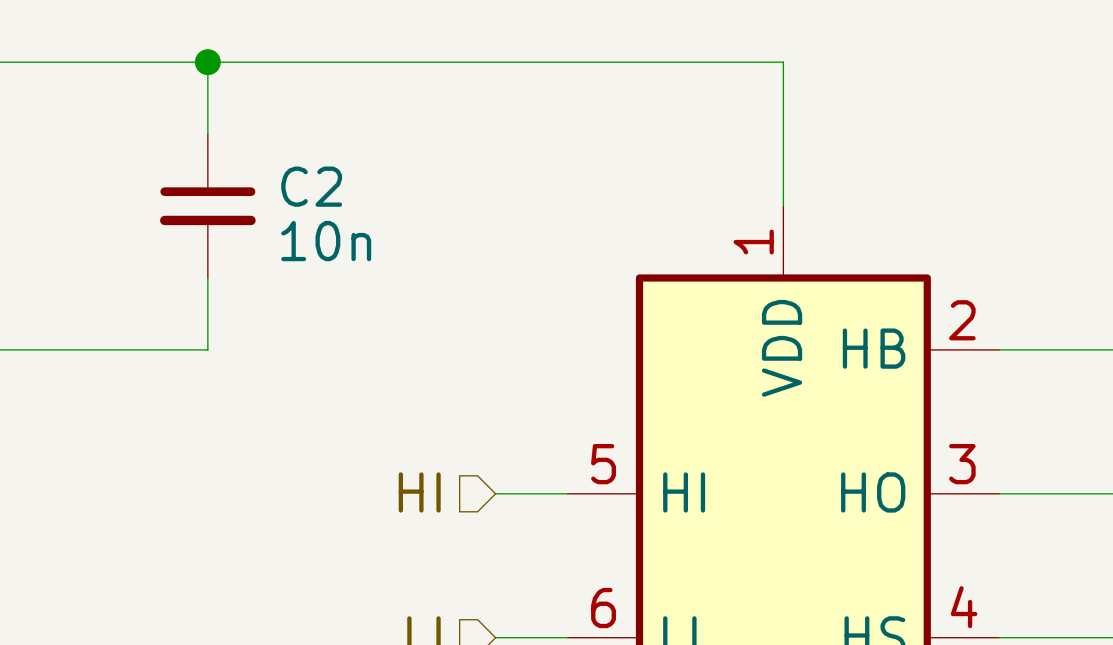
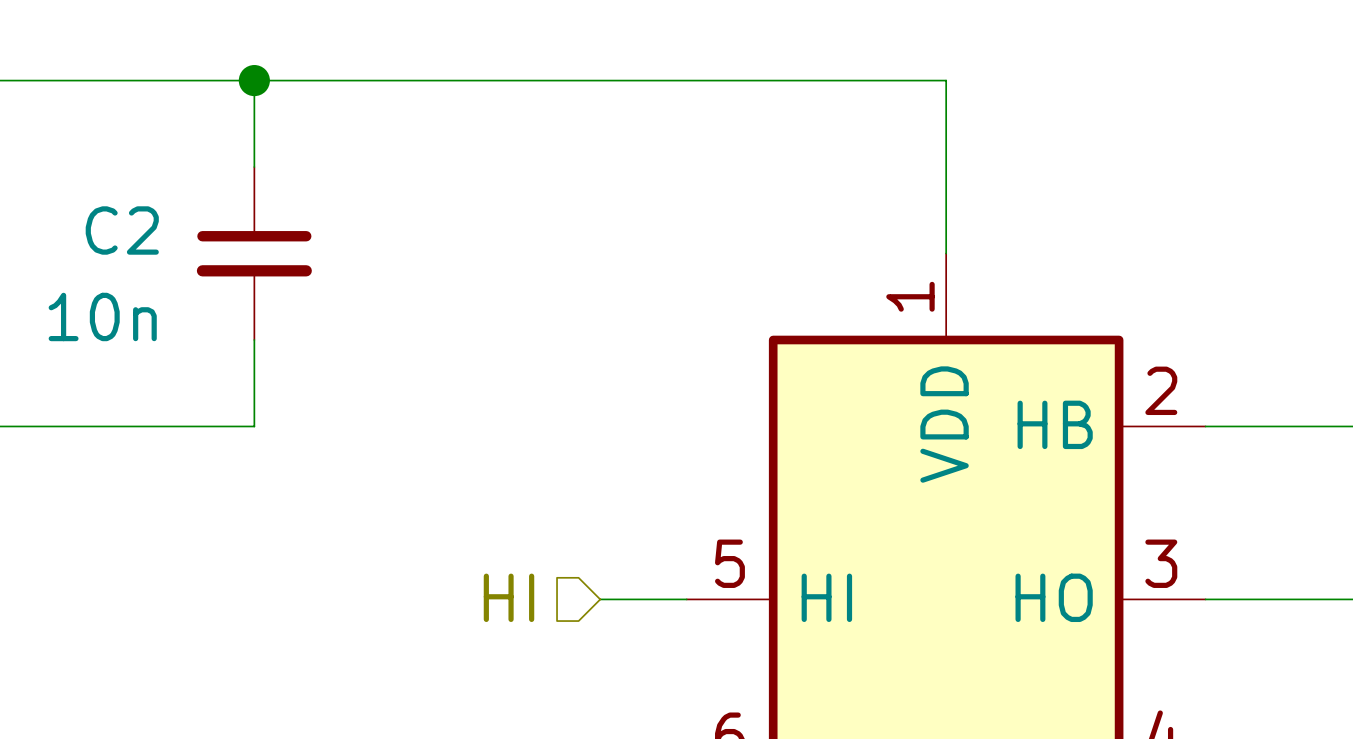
C2 name position: C2 (311, 186) -> C2 (122, 230)
C2 value position: 10n (326, 241) -> 10n (102, 316)

